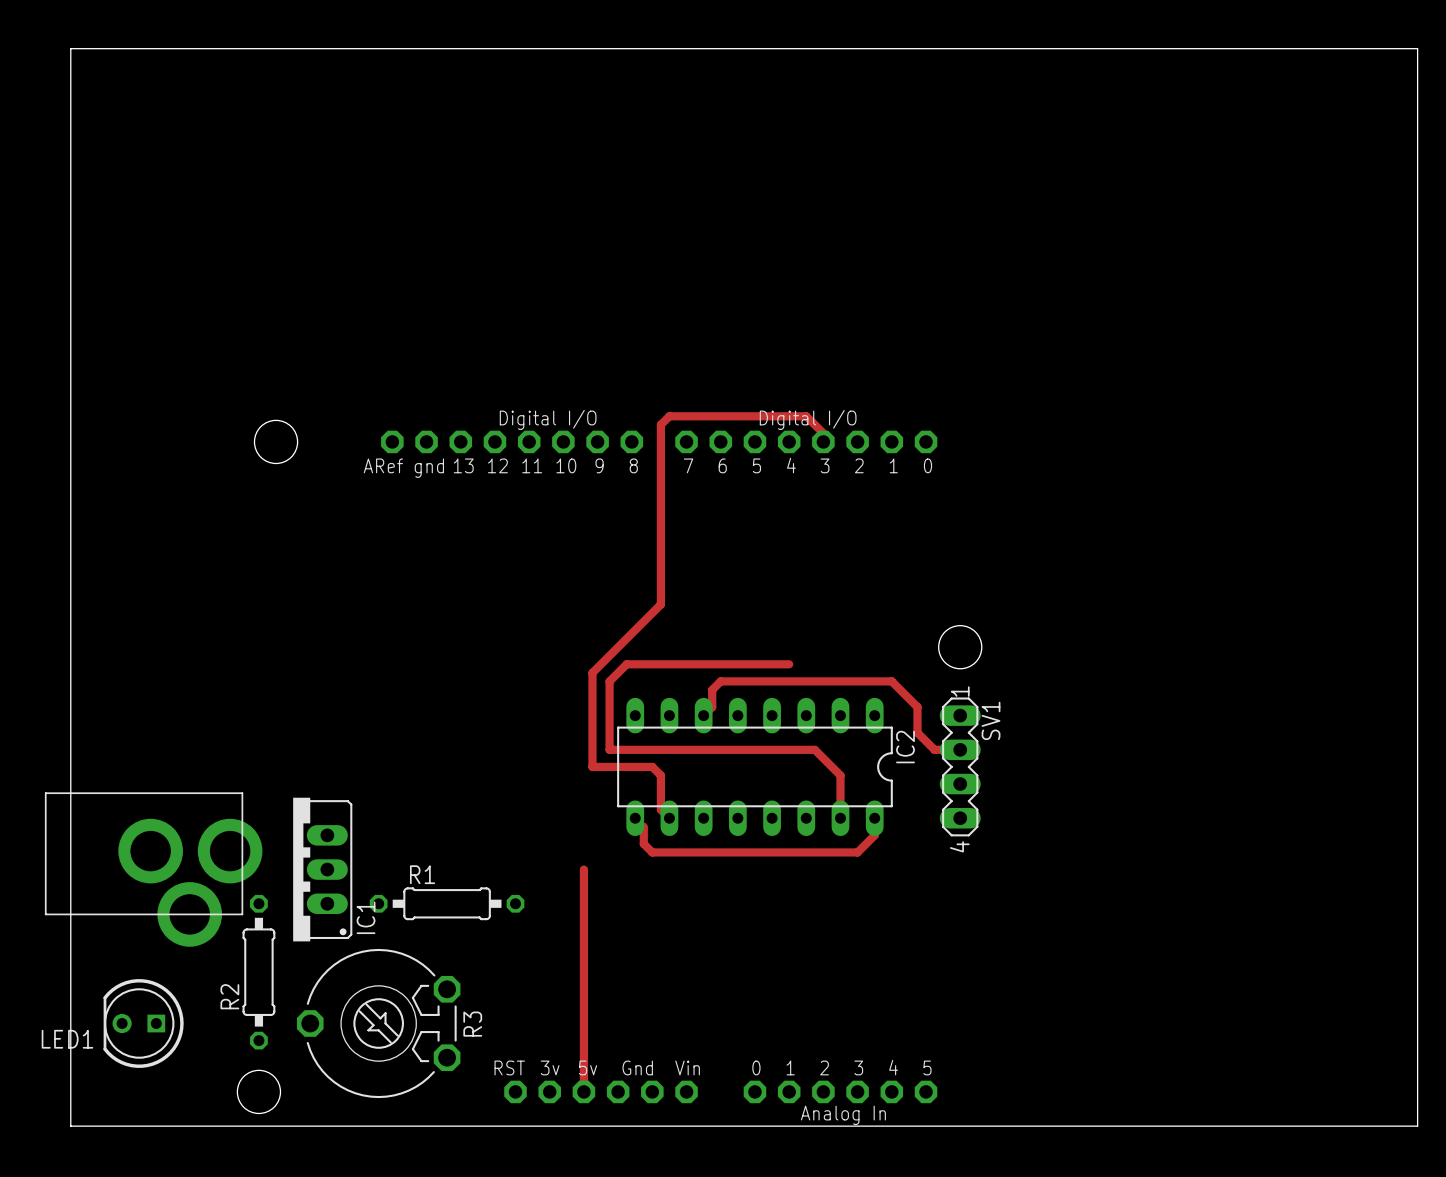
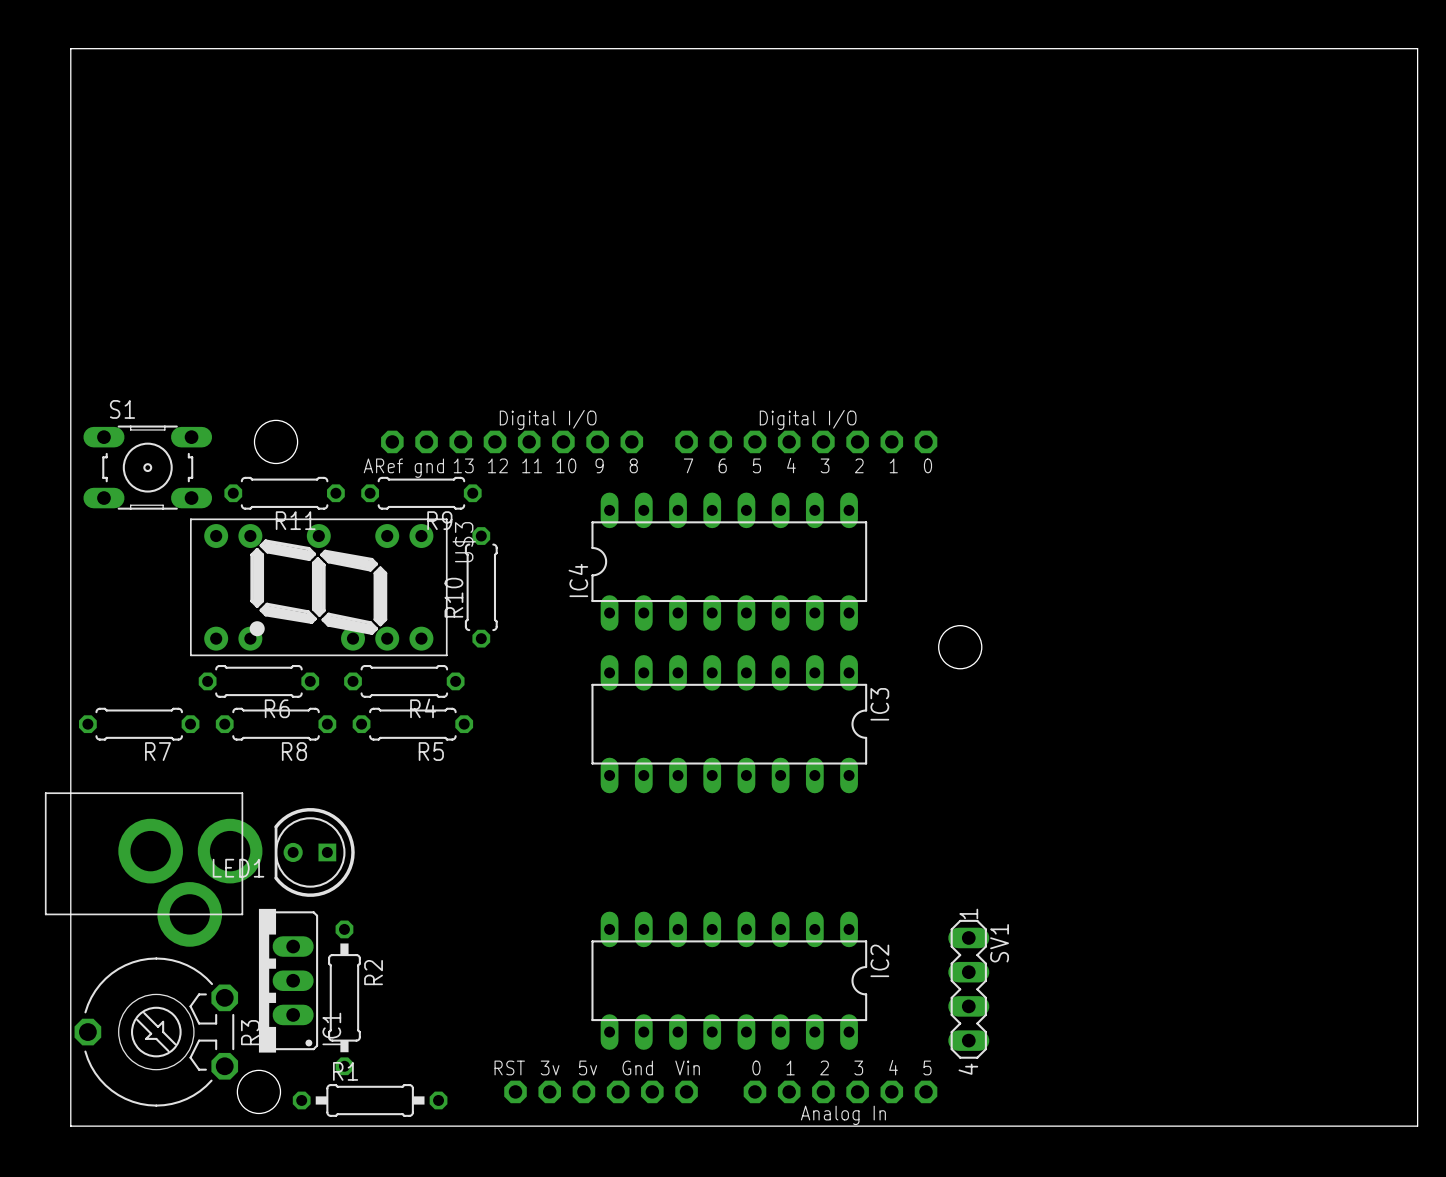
track: (823, 433) (806, 416) (669, 416) (660, 424) (660, 604) (592, 672) (592, 766) (652, 766) (660, 775) (660, 809) (669, 818) -> none
S1: none -> (147, 467)
R11: none -> (284, 493)
R9: none -> (421, 493)
IC4: none -> (729, 561)
U$3: none -> (318, 587)
R10: none -> (481, 587)
track: (789, 664) (626, 664) (609, 681) (609, 749) (814, 749) (840, 775) (840, 818) -> none
R6: none -> (258, 681)
R4: none -> (404, 681)
track: (703, 715) (712, 707) (712, 689) (720, 681) (891, 681) (917, 707) (917, 732) (934, 749) (960, 749) -> none
R7: none -> (139, 724)
R8: none -> (276, 724)
R5: none -> (412, 724)
IC3: none -> (729, 724)
IC2 position: (754, 766) -> (729, 980)
SV1 position: (960, 766) -> (968, 989)
track: (874, 818) (874, 835) (857, 852) (652, 852) (643, 843) (643, 826) -> none
IC1 position: (322, 869) -> (288, 980)
track: (583, 869) (583, 1091) -> none
R1 position: (447, 903) -> (370, 1100)
R2 position: (258, 972) -> (344, 997)
R2 name position: R2 (229, 996) -> R2 (373, 972)
LED1 position: (143, 1023) -> (314, 852)
R3 position: (378, 1023) -> (156, 1032)

